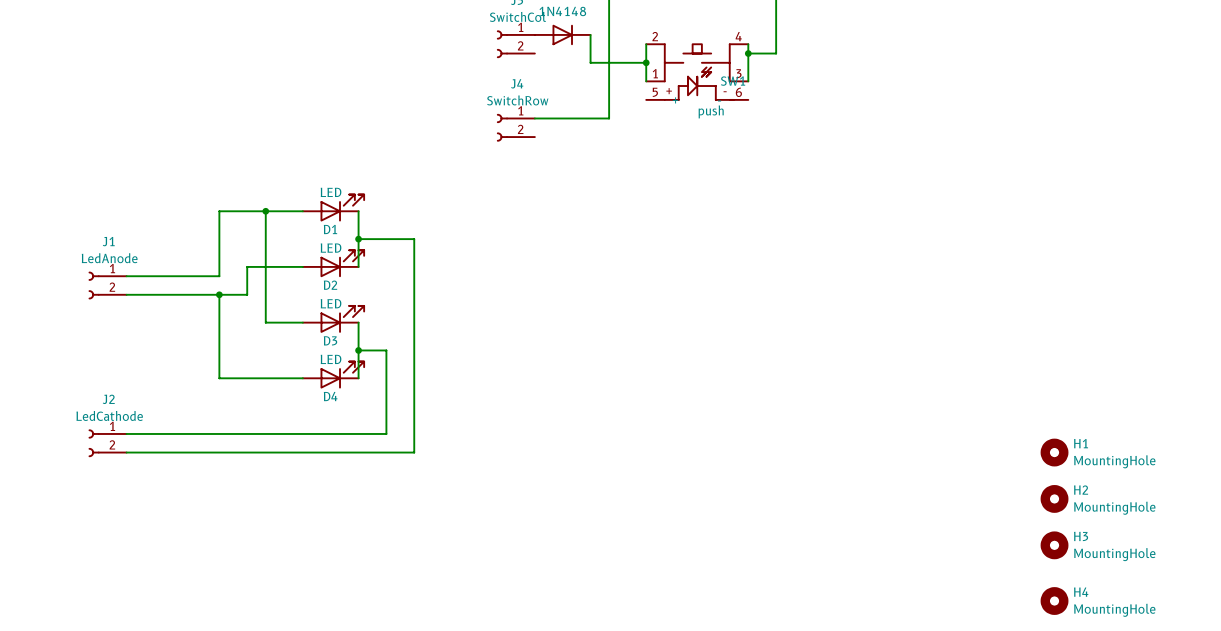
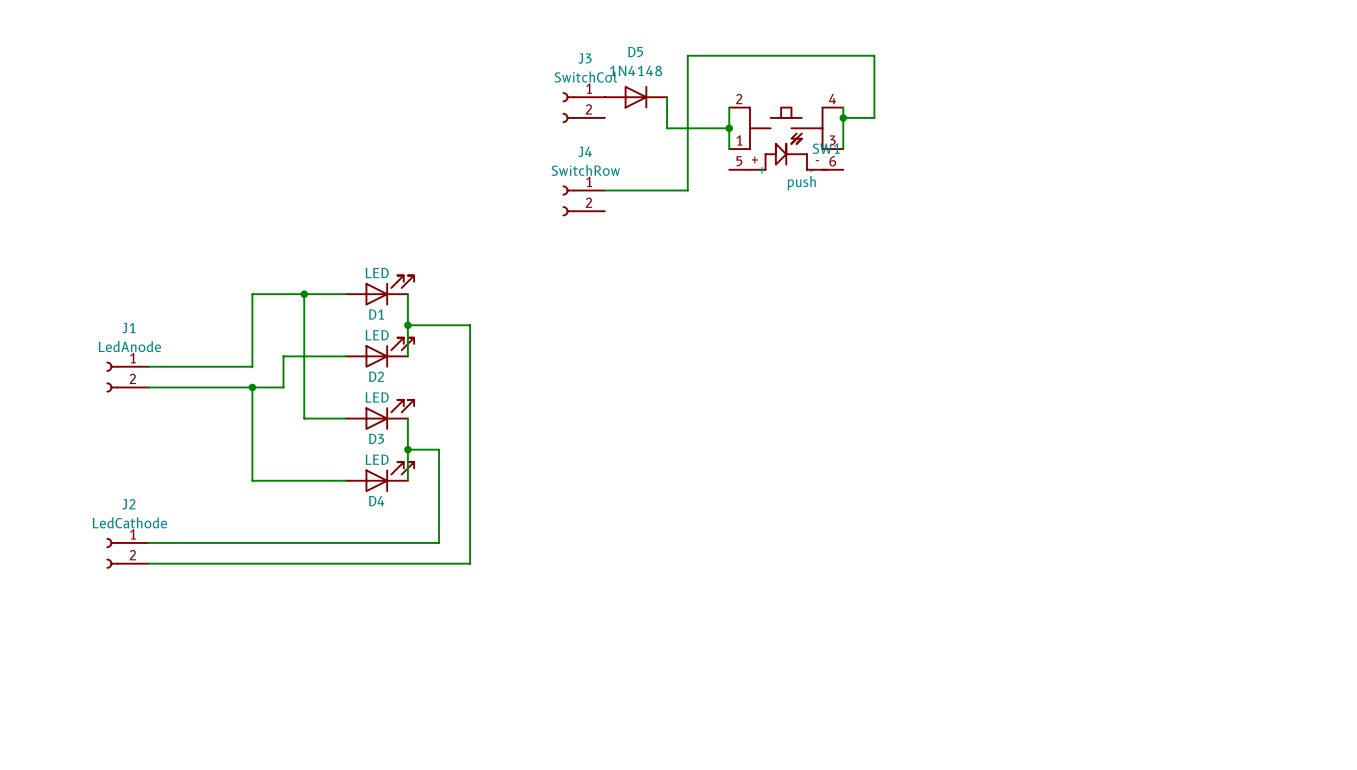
H1: MountingHole (1054, 452) -> none
H2: MountingHole (1054, 498) -> none
H3: MountingHole (1054, 545) -> none
H4: MountingHole (1054, 601) -> none

